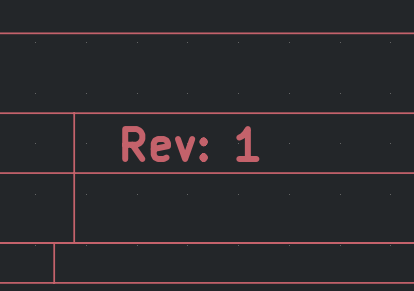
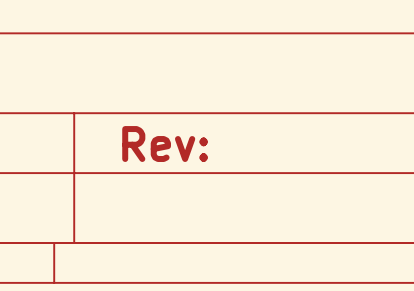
title block: Rev: 1 (190, 144) -> Rev: (165, 144)

